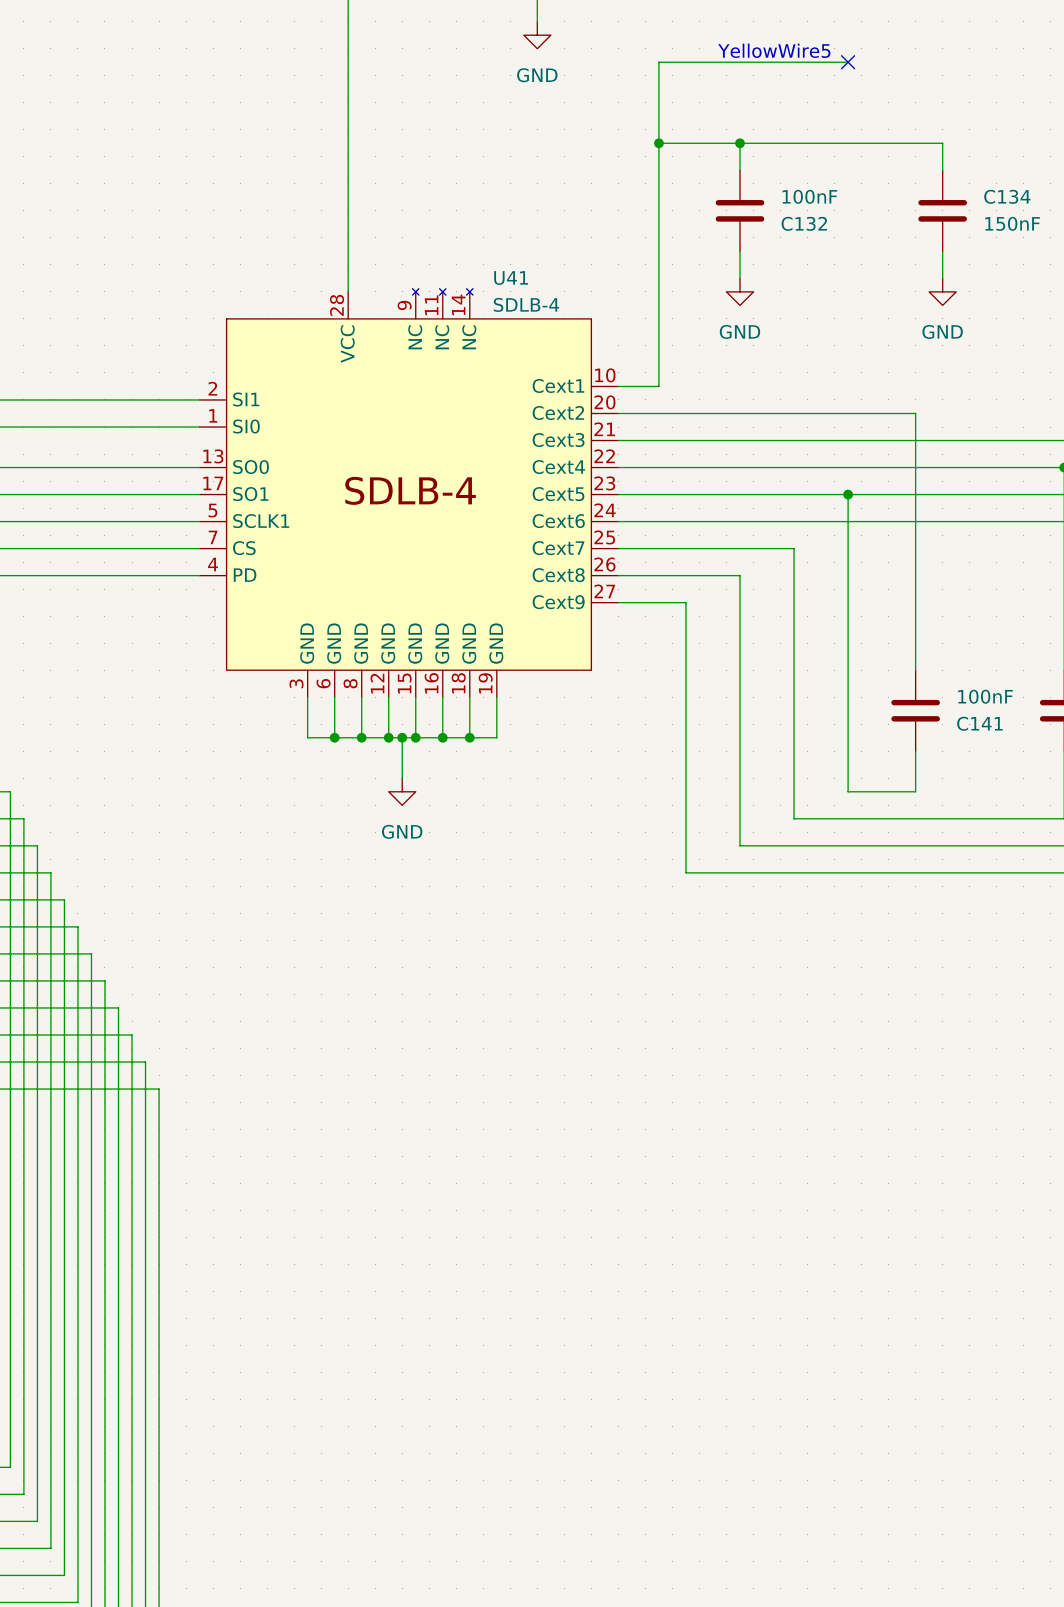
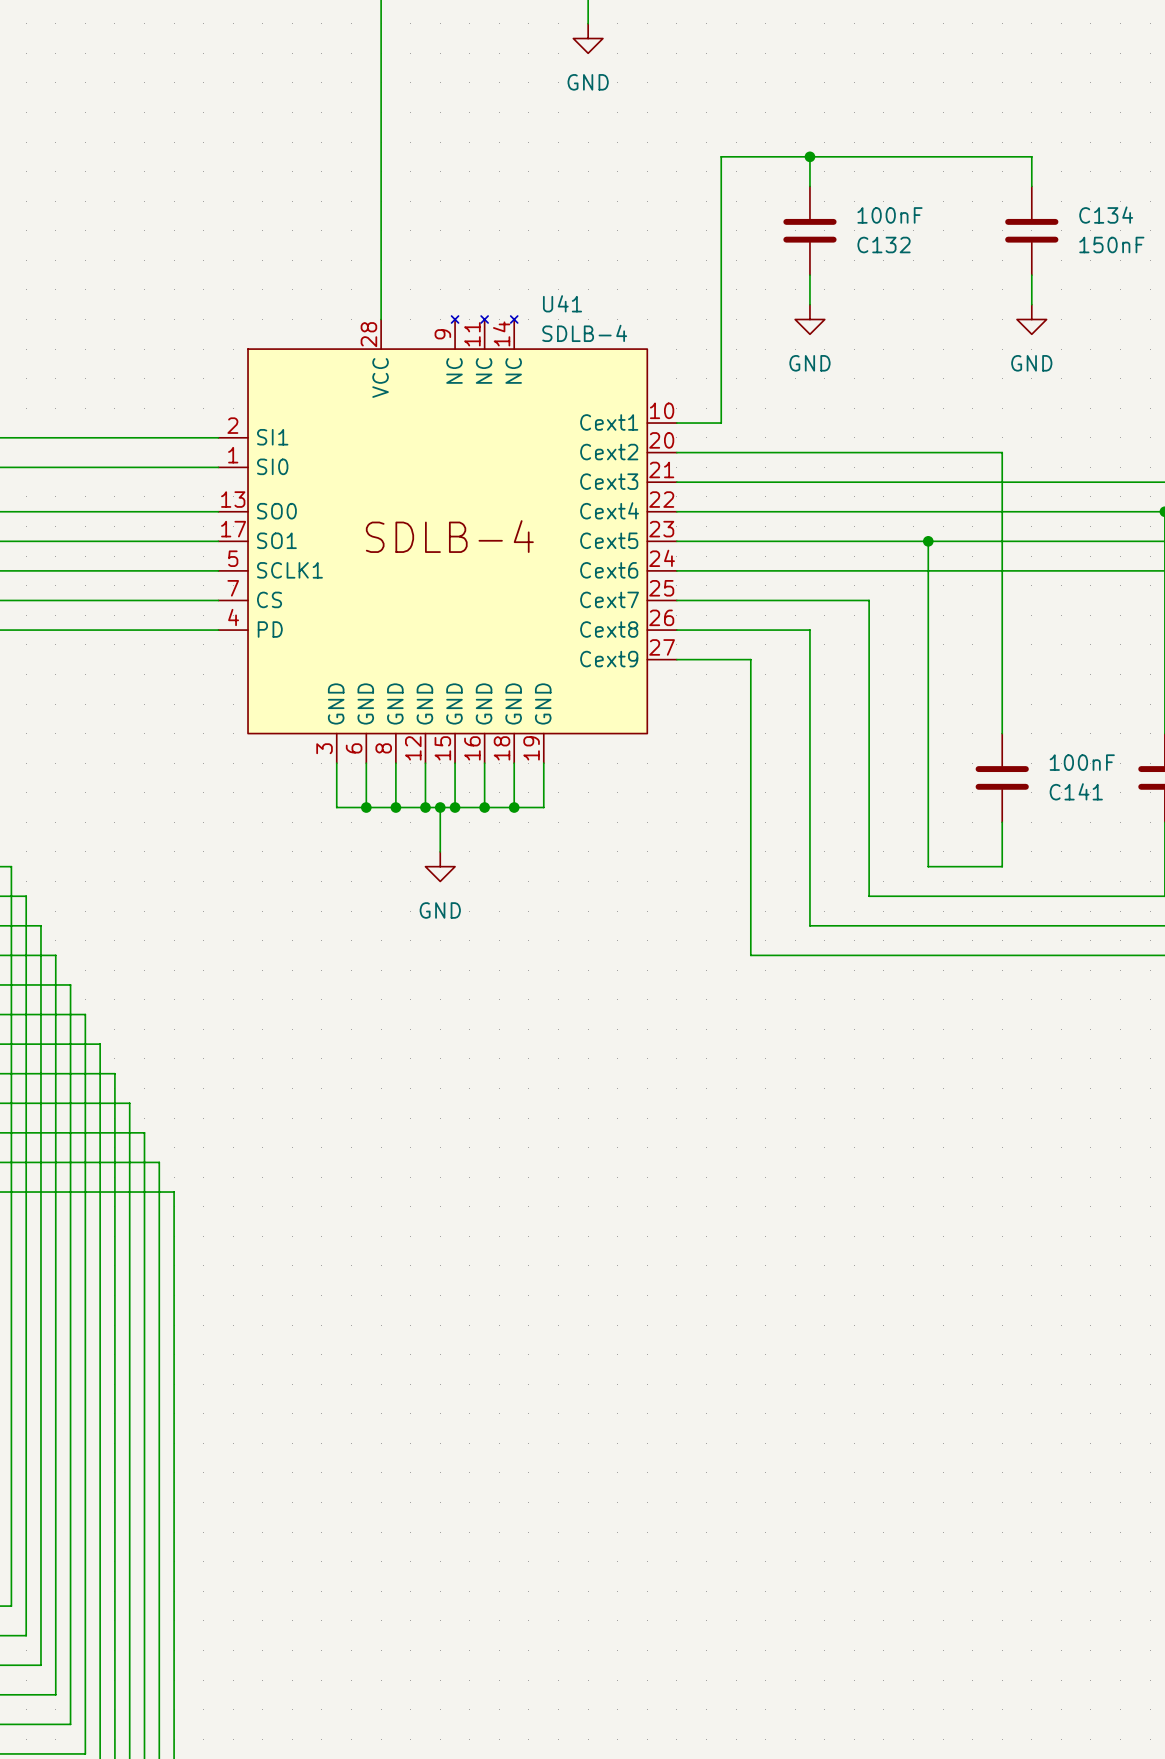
text: YellowWire5 (774, 50) -> none
wire: (848, 62) (658, 62) (658, 143) -> none
no-connect mark: (848, 62) -> none
junction: (658, 143) -> none

